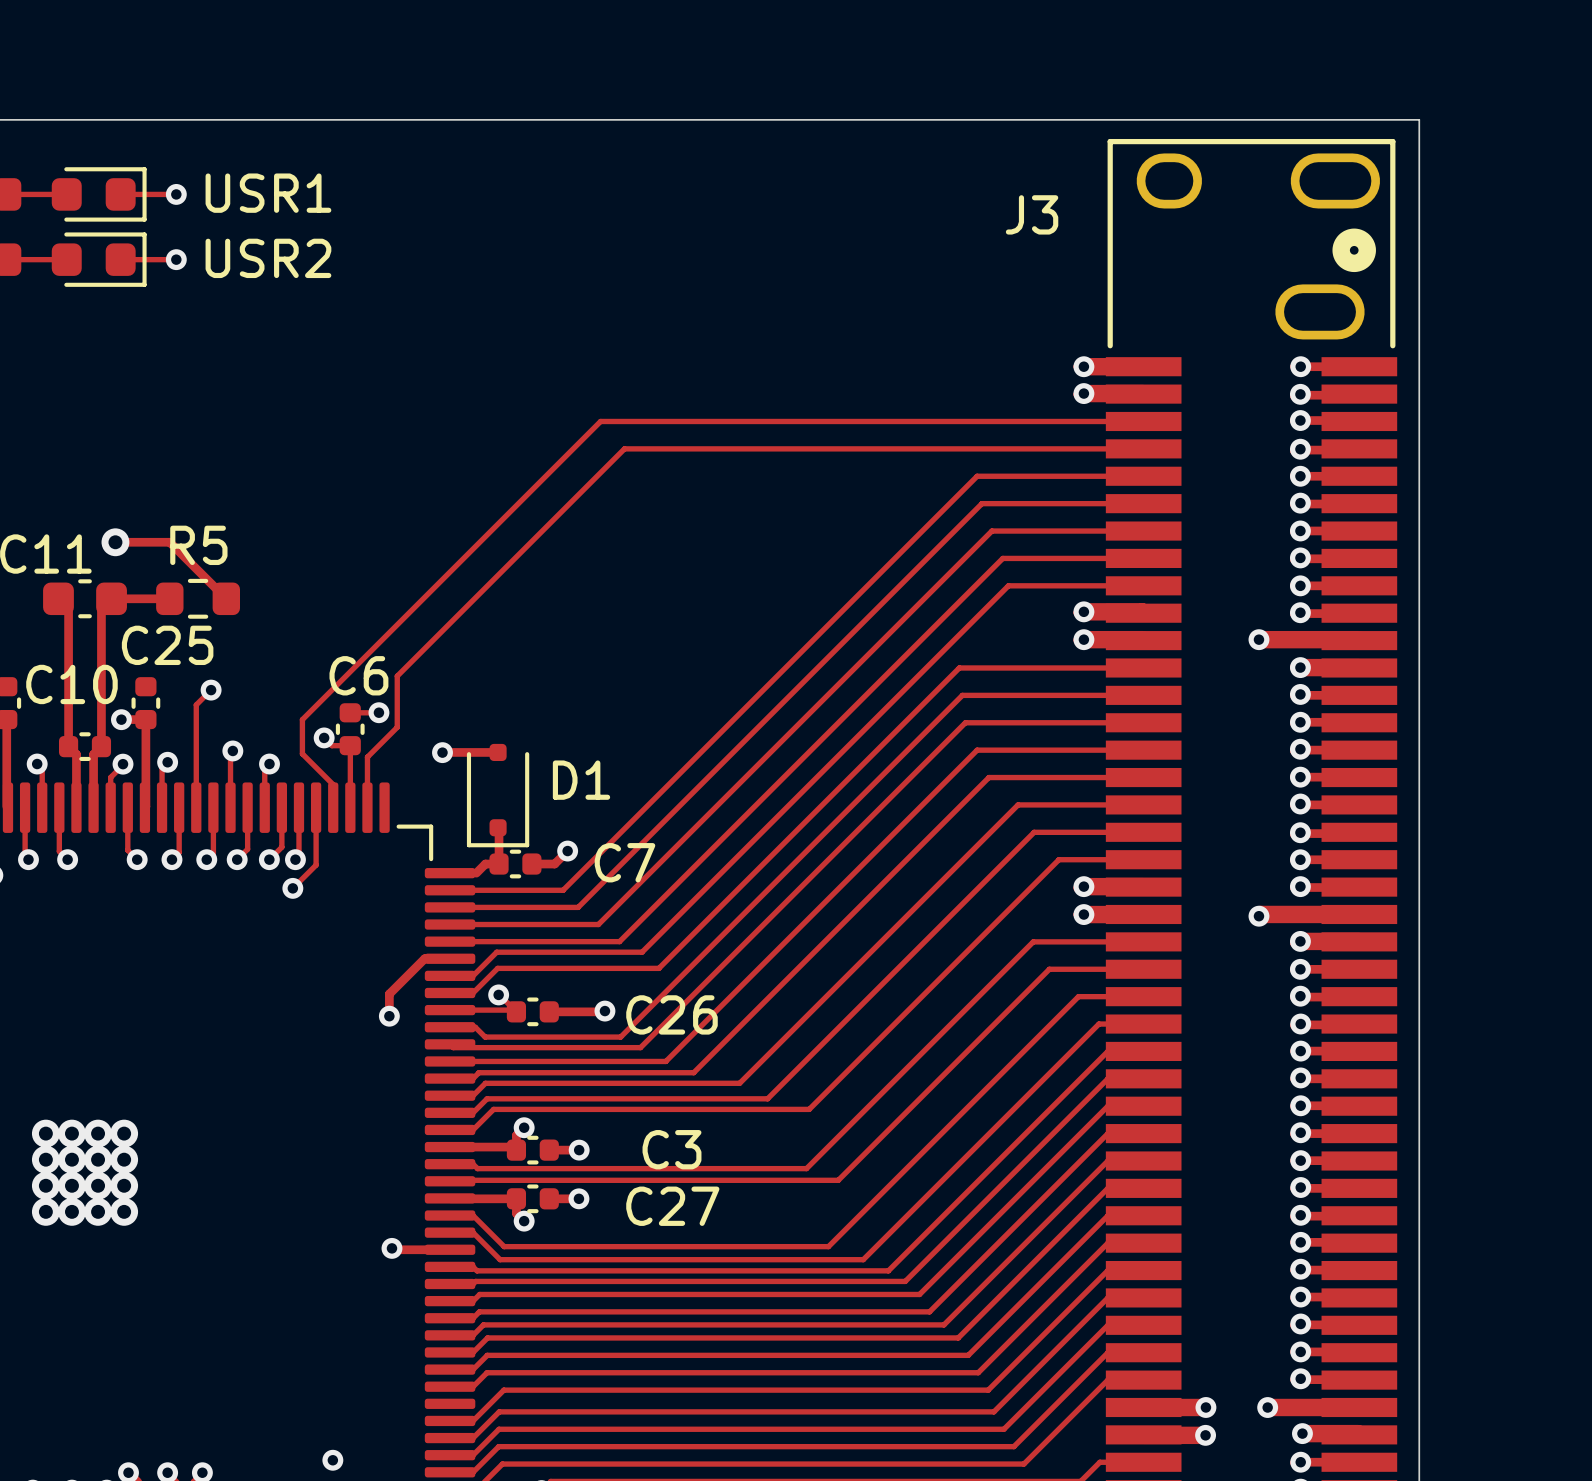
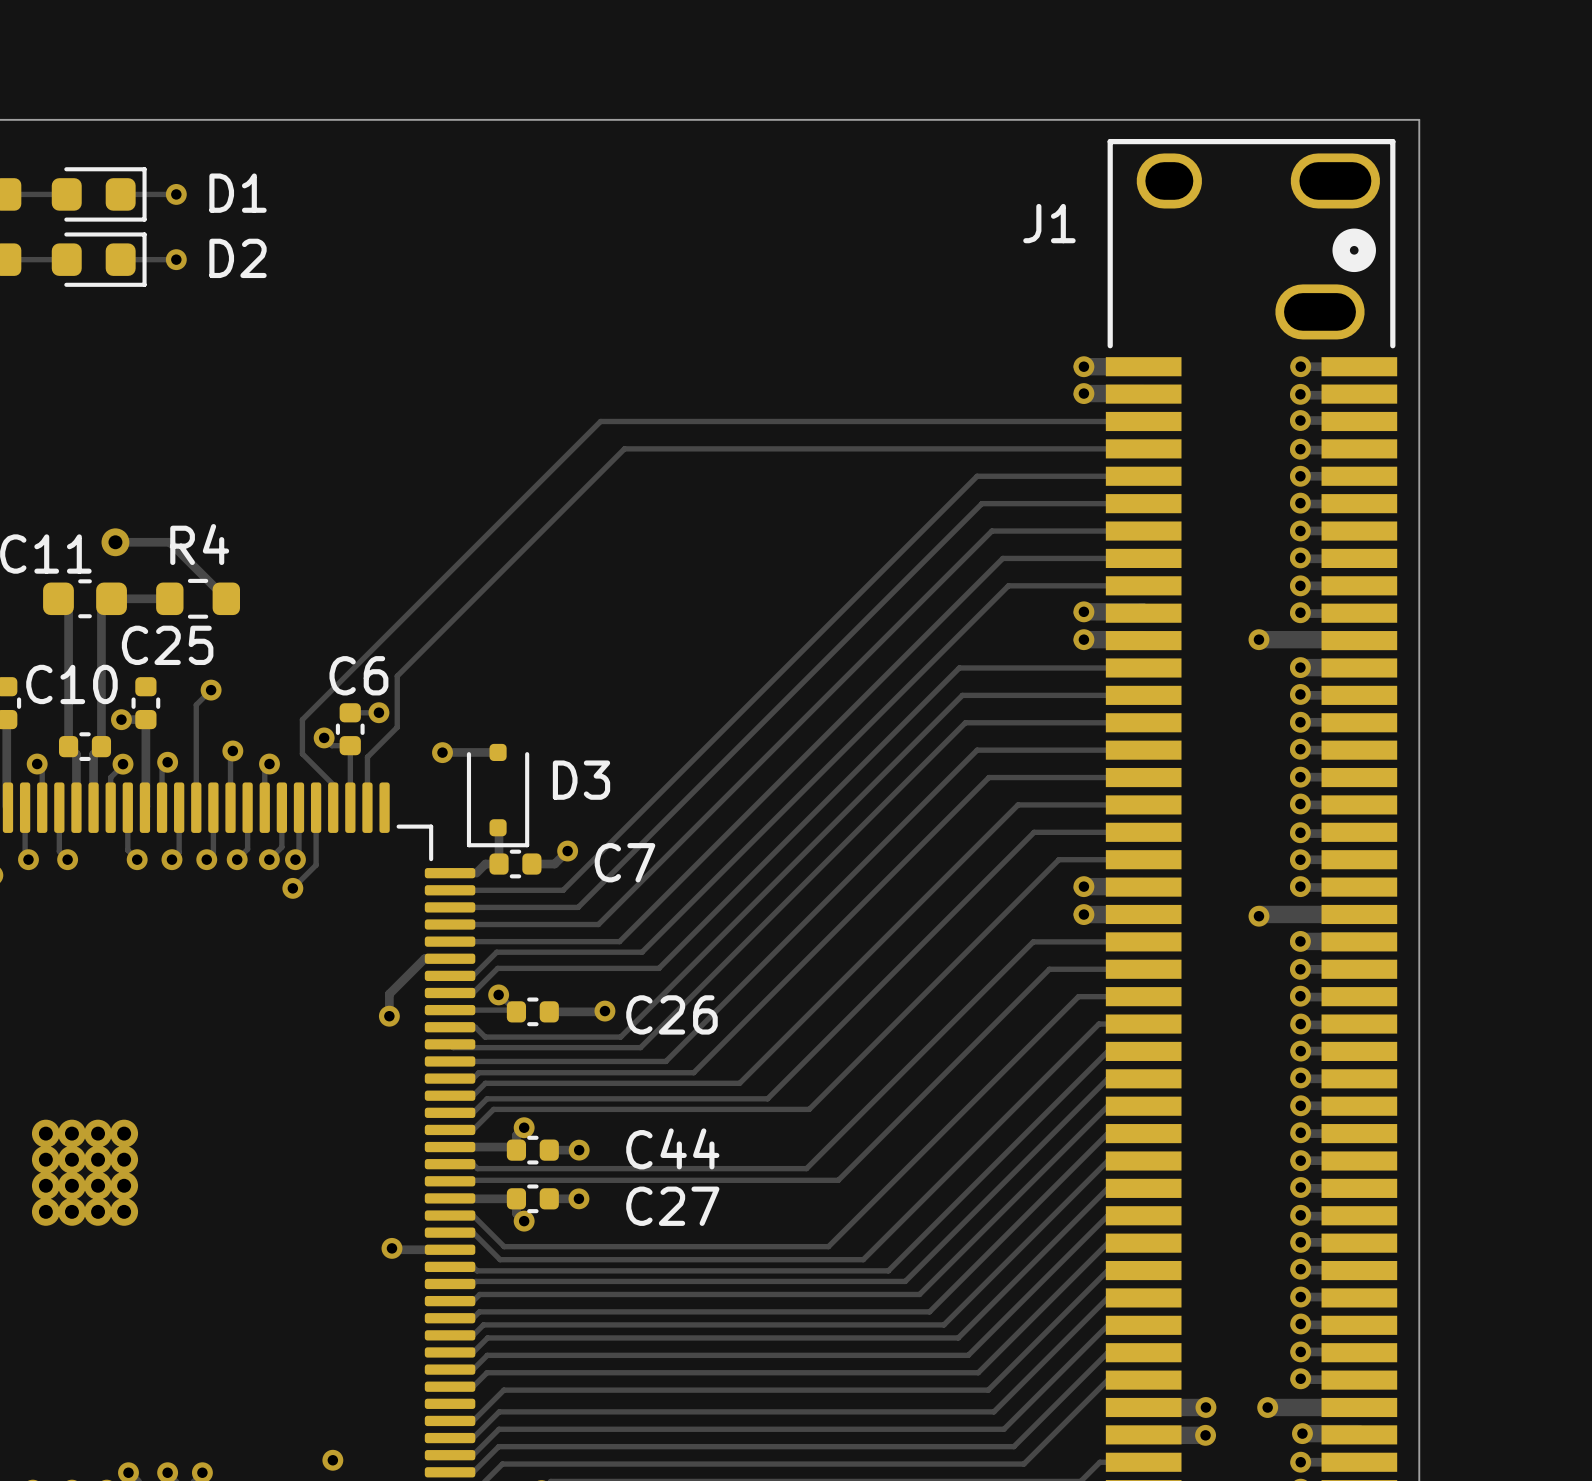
USR1 name: USR1 (268, 193) -> D1 (238, 193)
J3 name: J3 (1032, 214) -> J1 (1049, 223)
USR2 name: USR2 (268, 258) -> D2 (238, 258)
R5 name: R5 (198, 545) -> R4 (199, 544)
D1 name: D1 (581, 780) -> D3 (581, 780)
C3 name: C3 (671, 1149) -> C44 (672, 1148)

